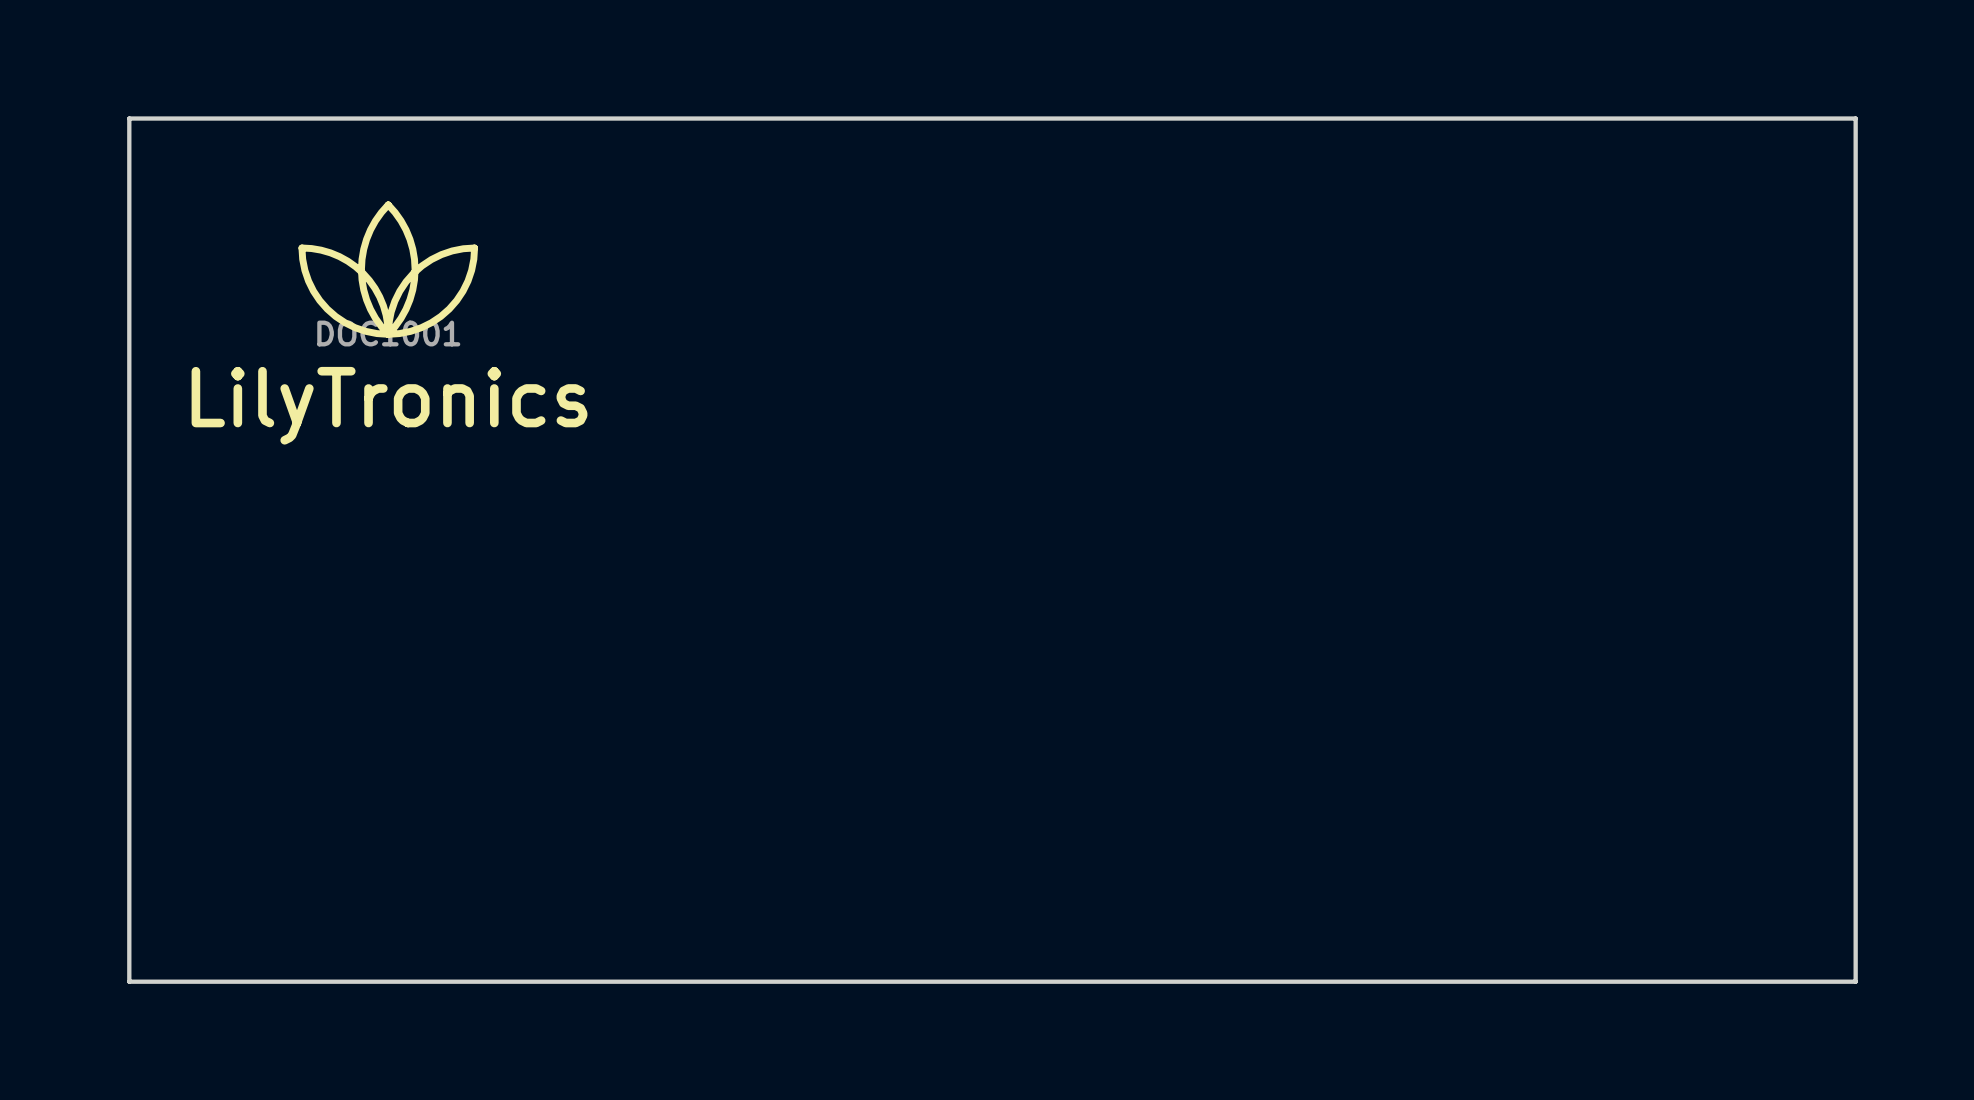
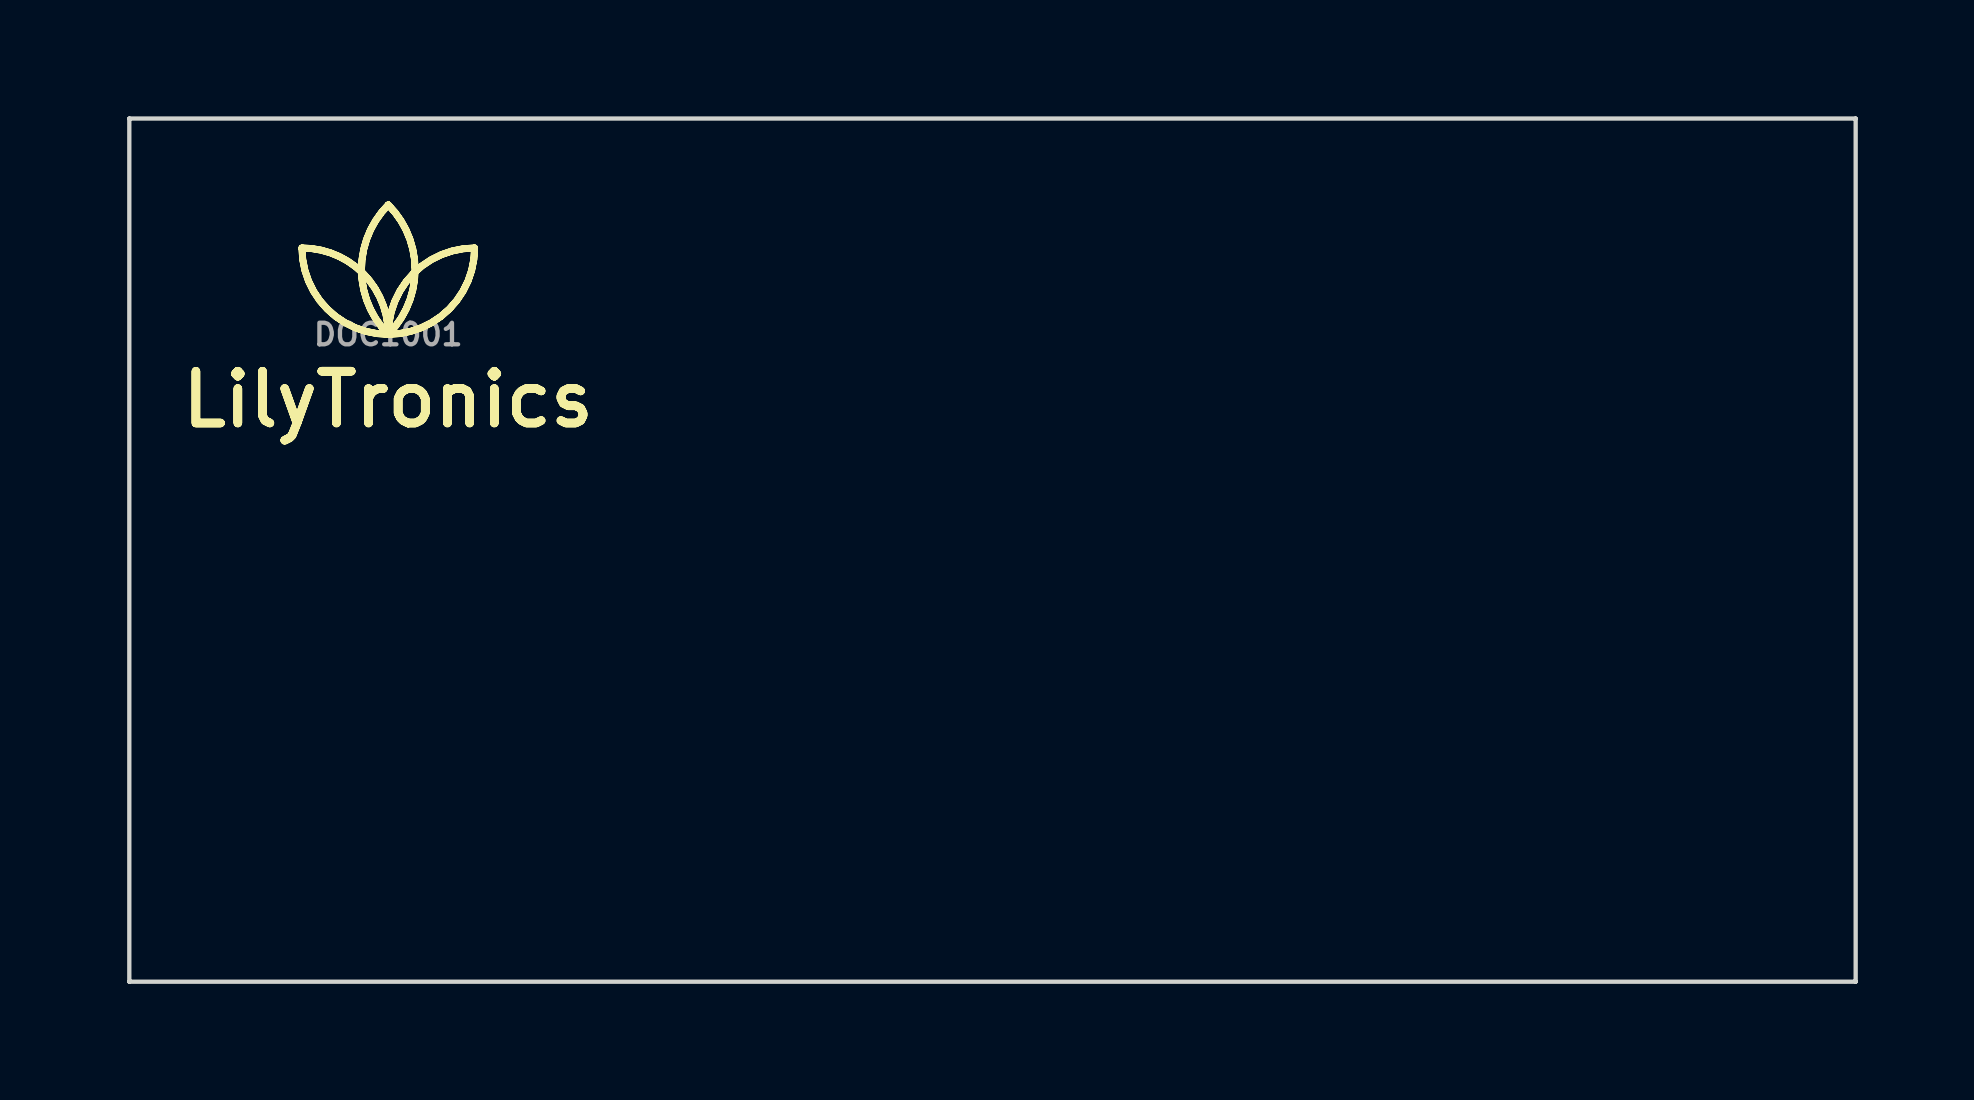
drawing: none -> [298, 201, 479, 338]

